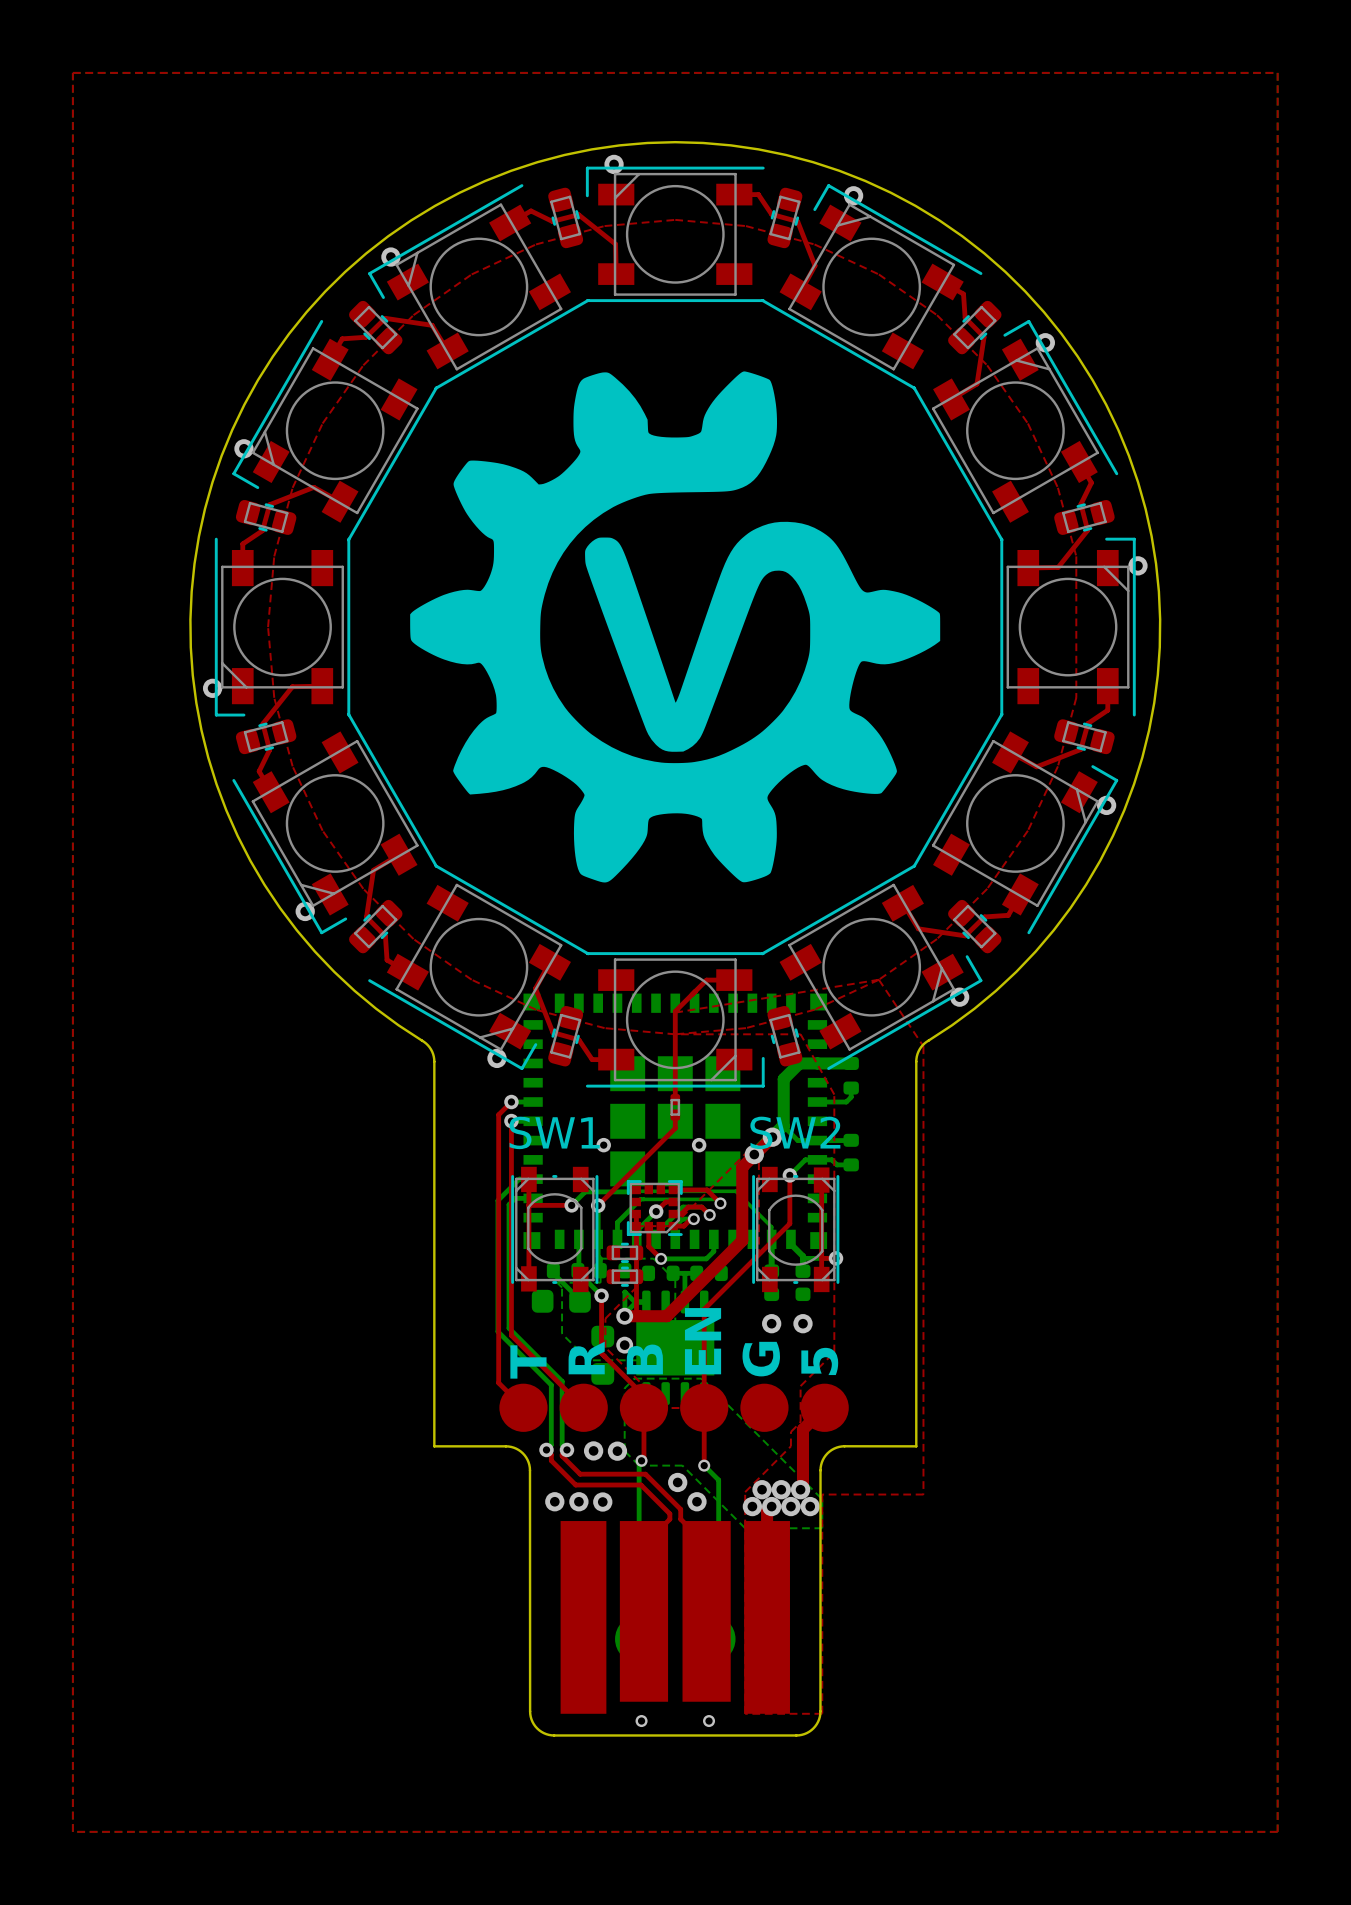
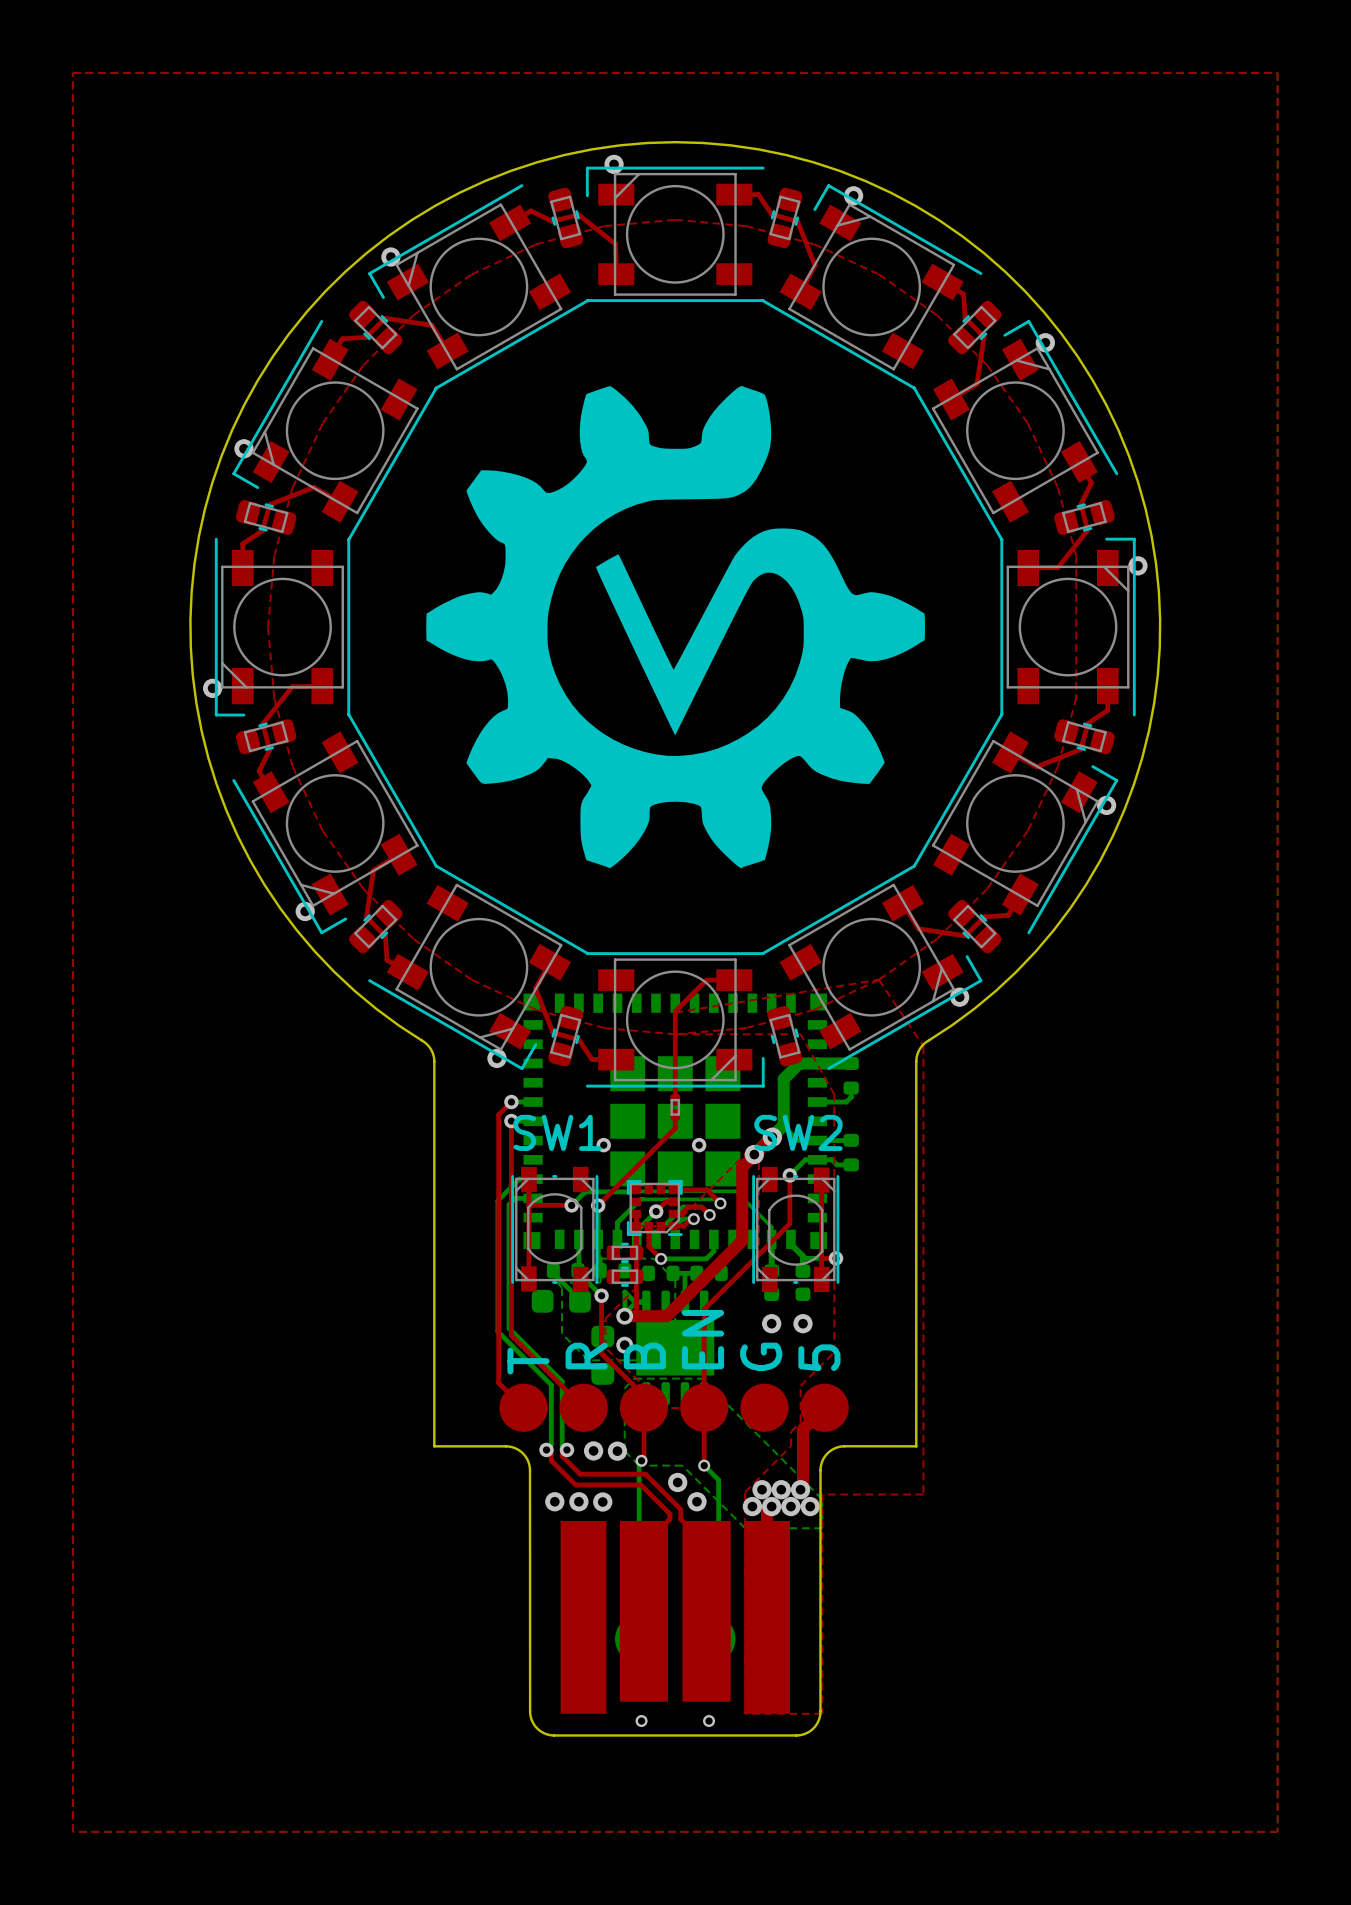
drawing shape: [410, 371, 941, 883] -> [426, 386, 925, 869]

